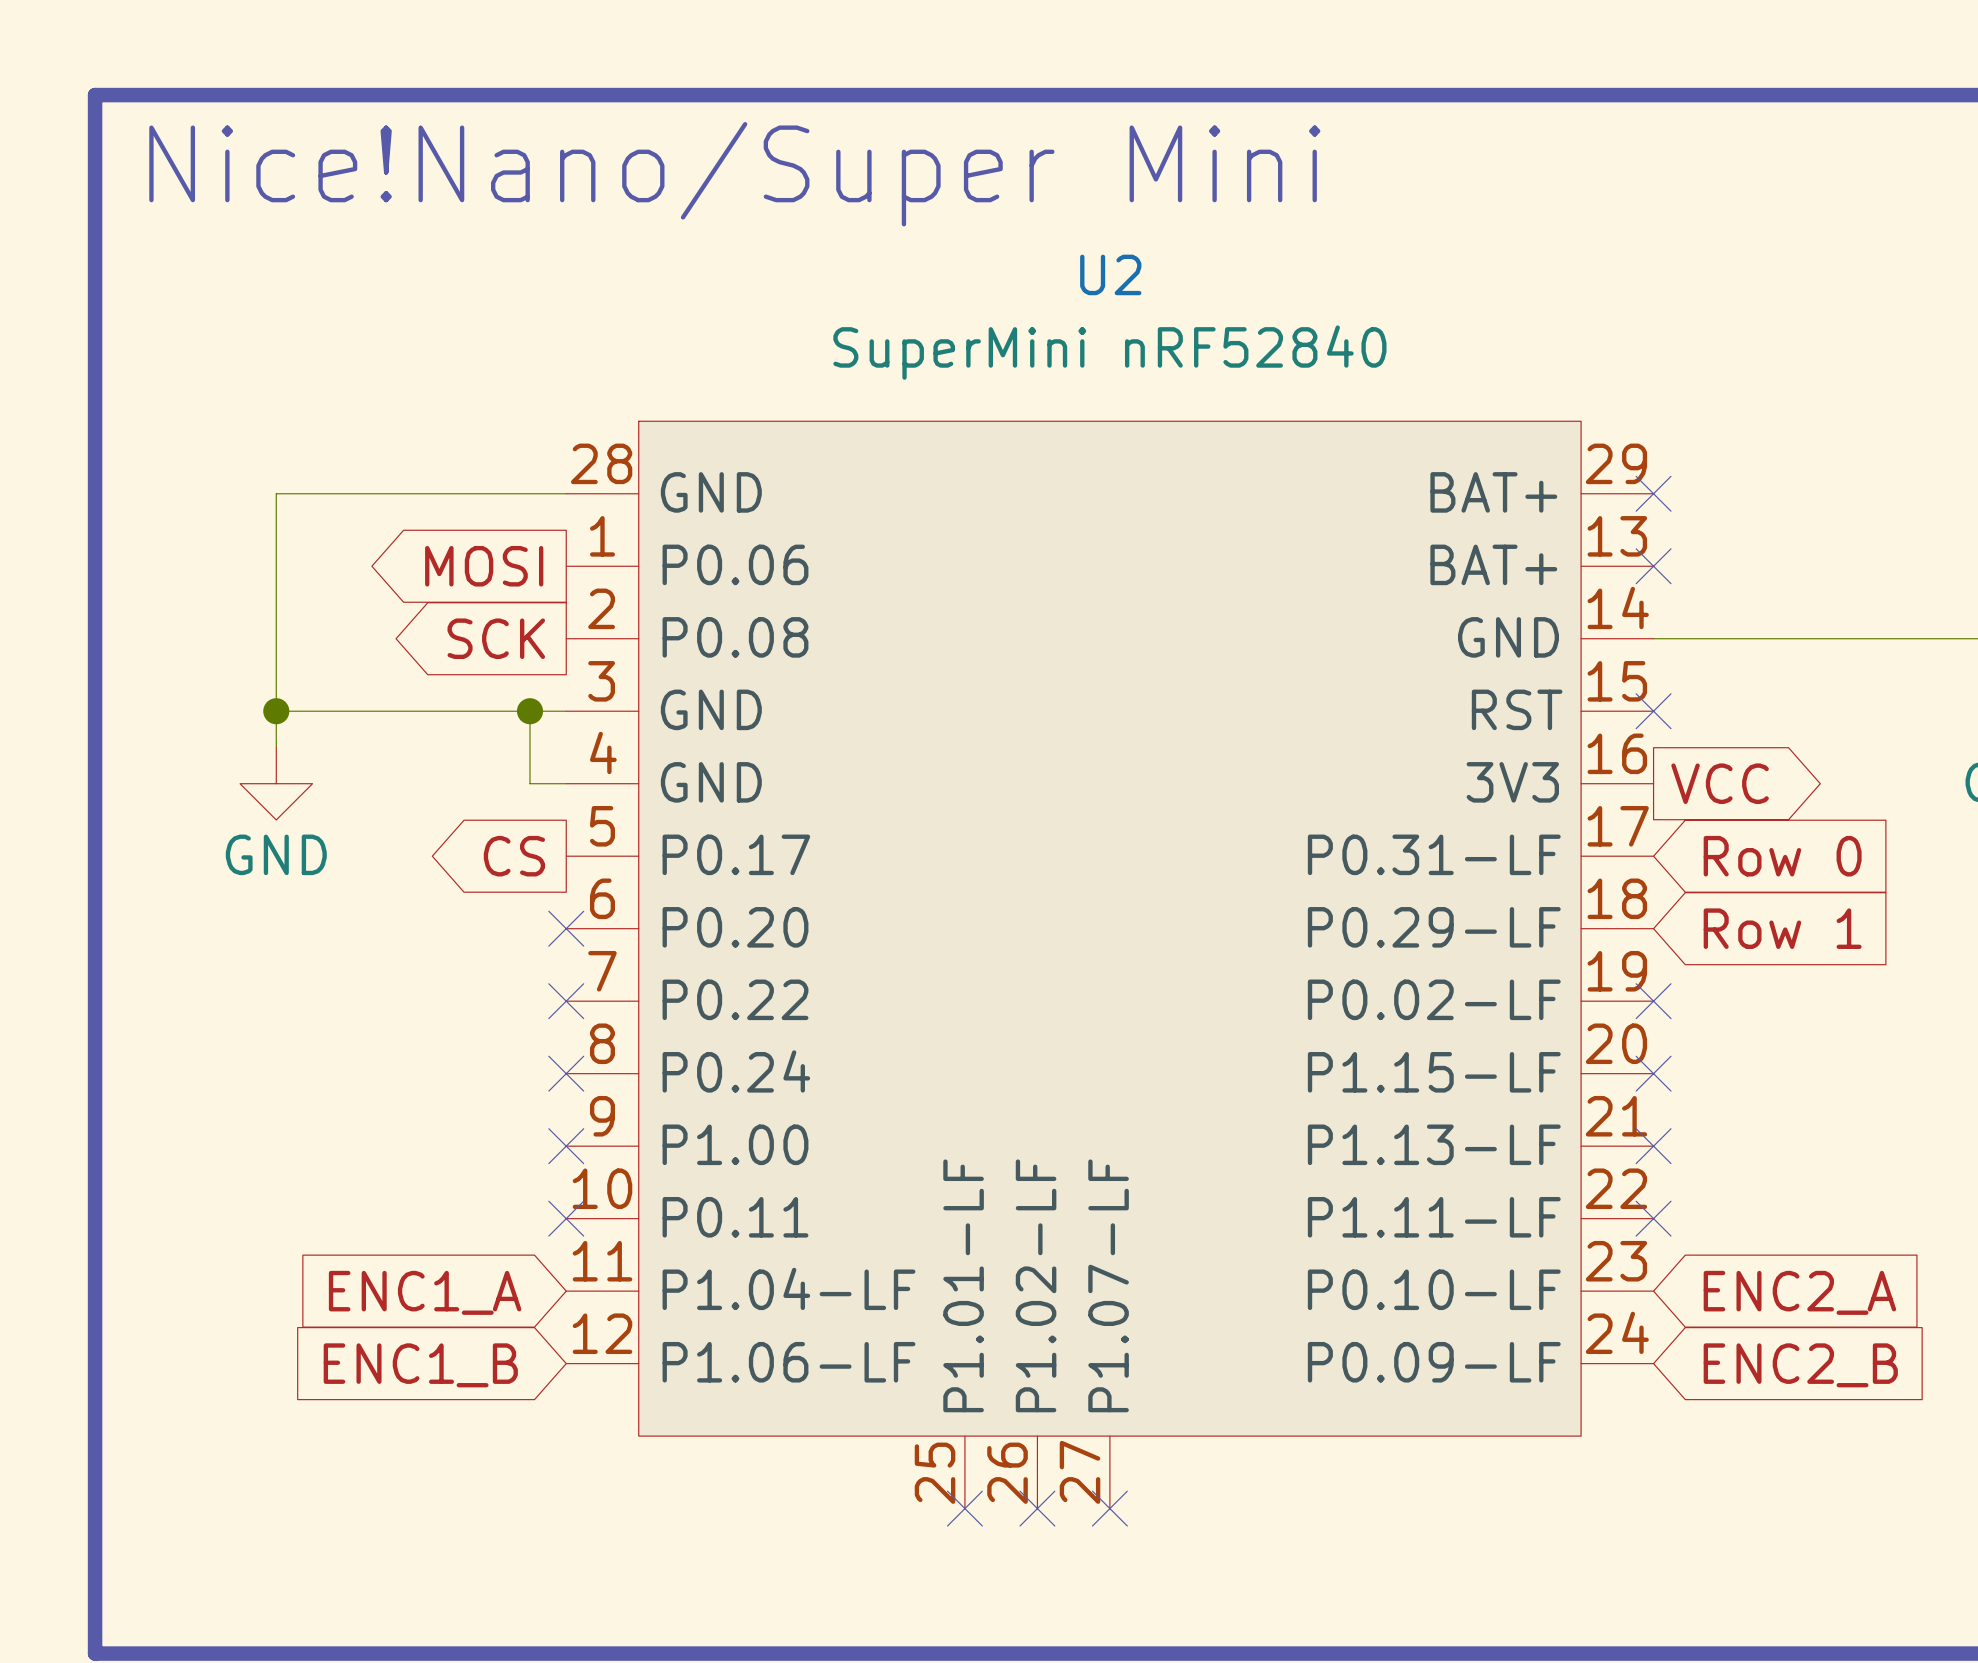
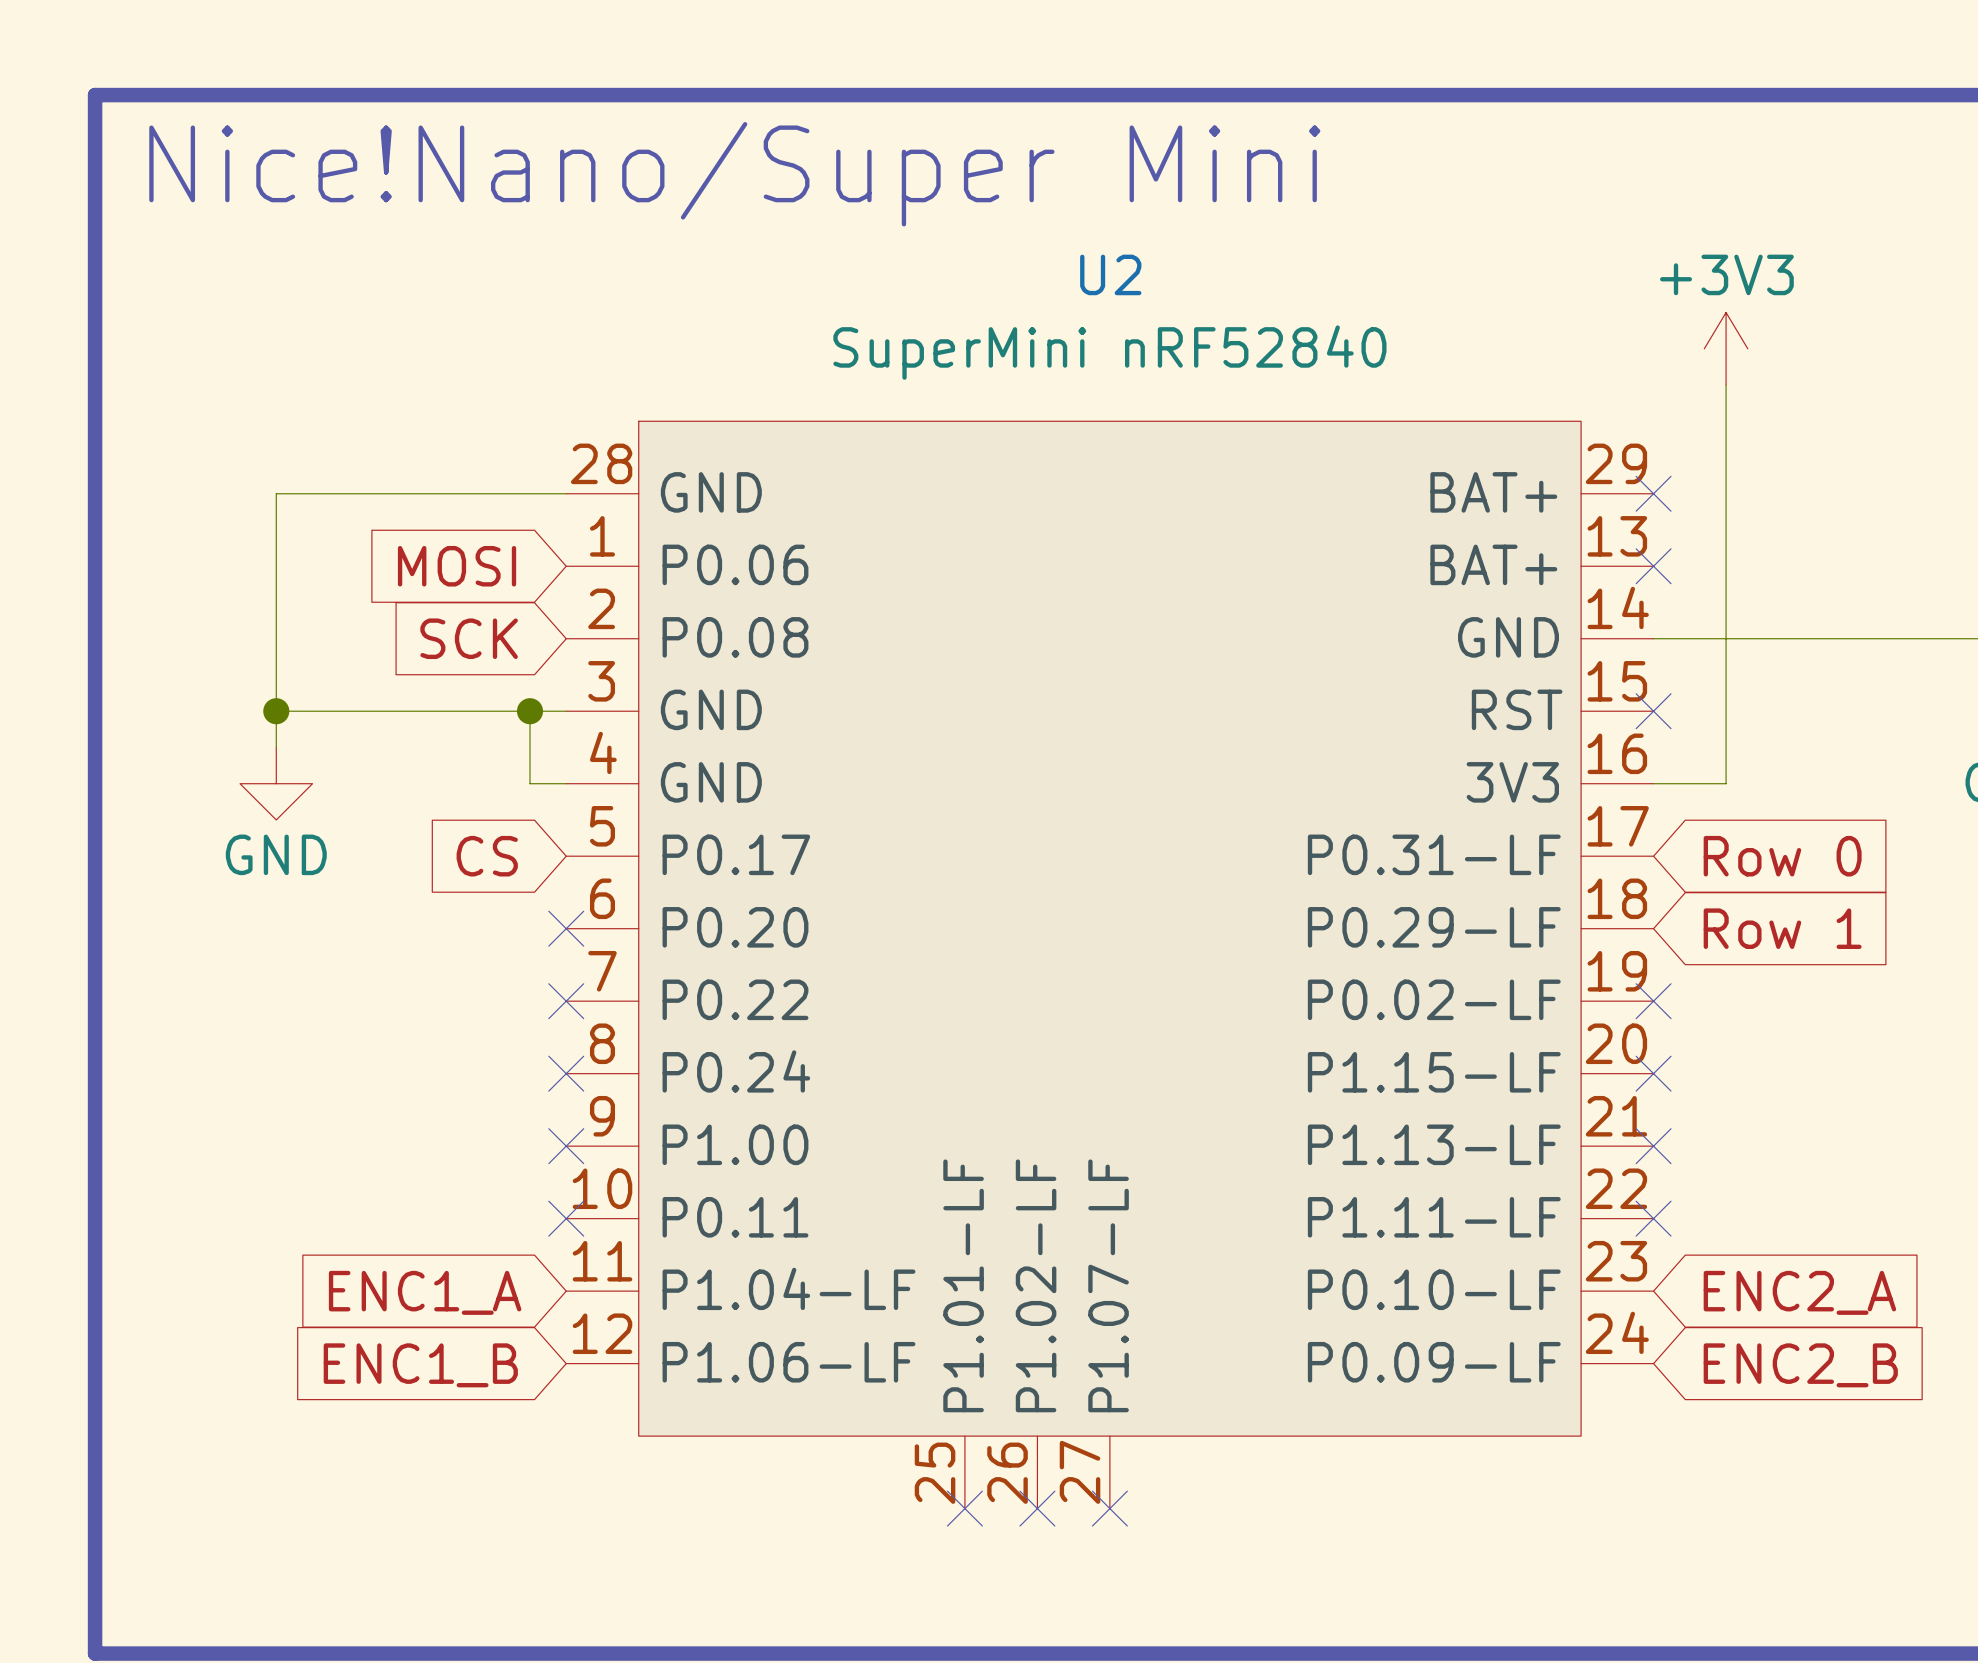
power symbol: none -> +3V3 (1726, 348)
wire: none -> (1726, 385) (1726, 783) (1653, 783)
global label shape: output (484, 566) -> input (457, 566)
global label shape: output (496, 638) -> input (469, 638)
global label: VCC (1720, 783) -> none
global label shape: output (514, 856) -> input (487, 856)

